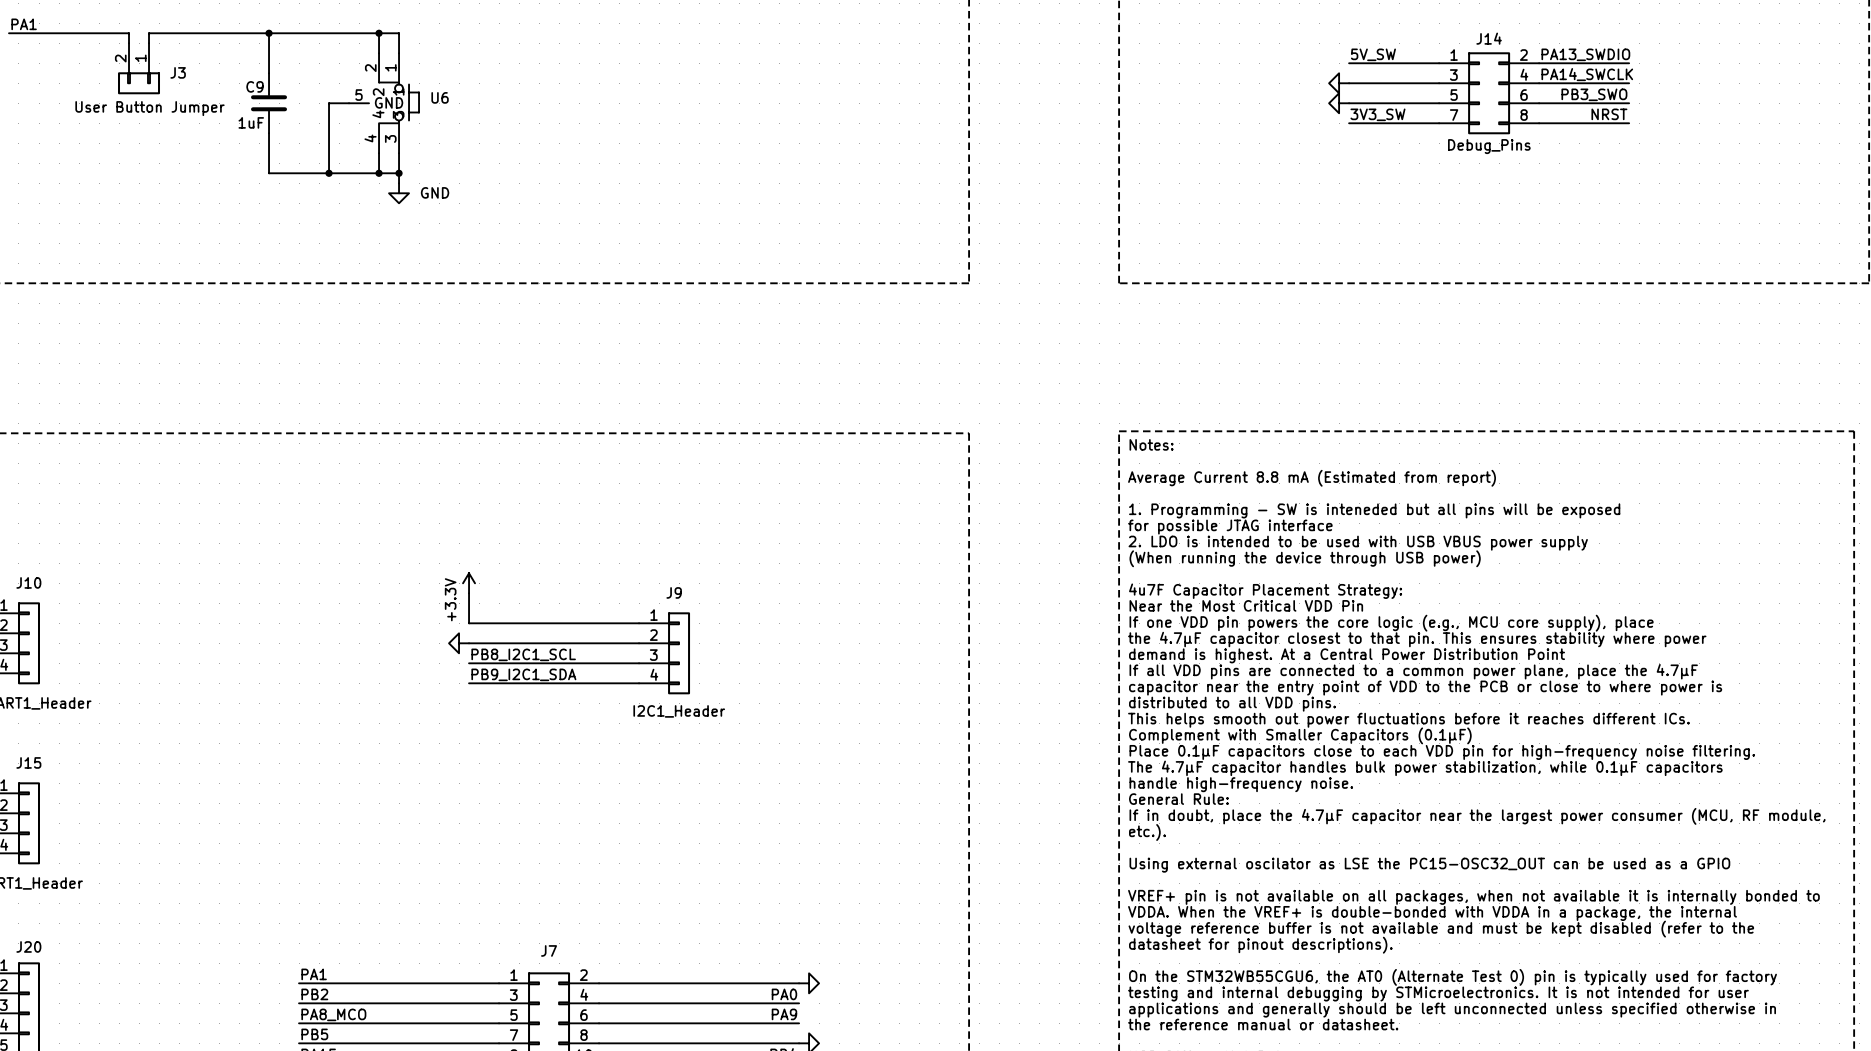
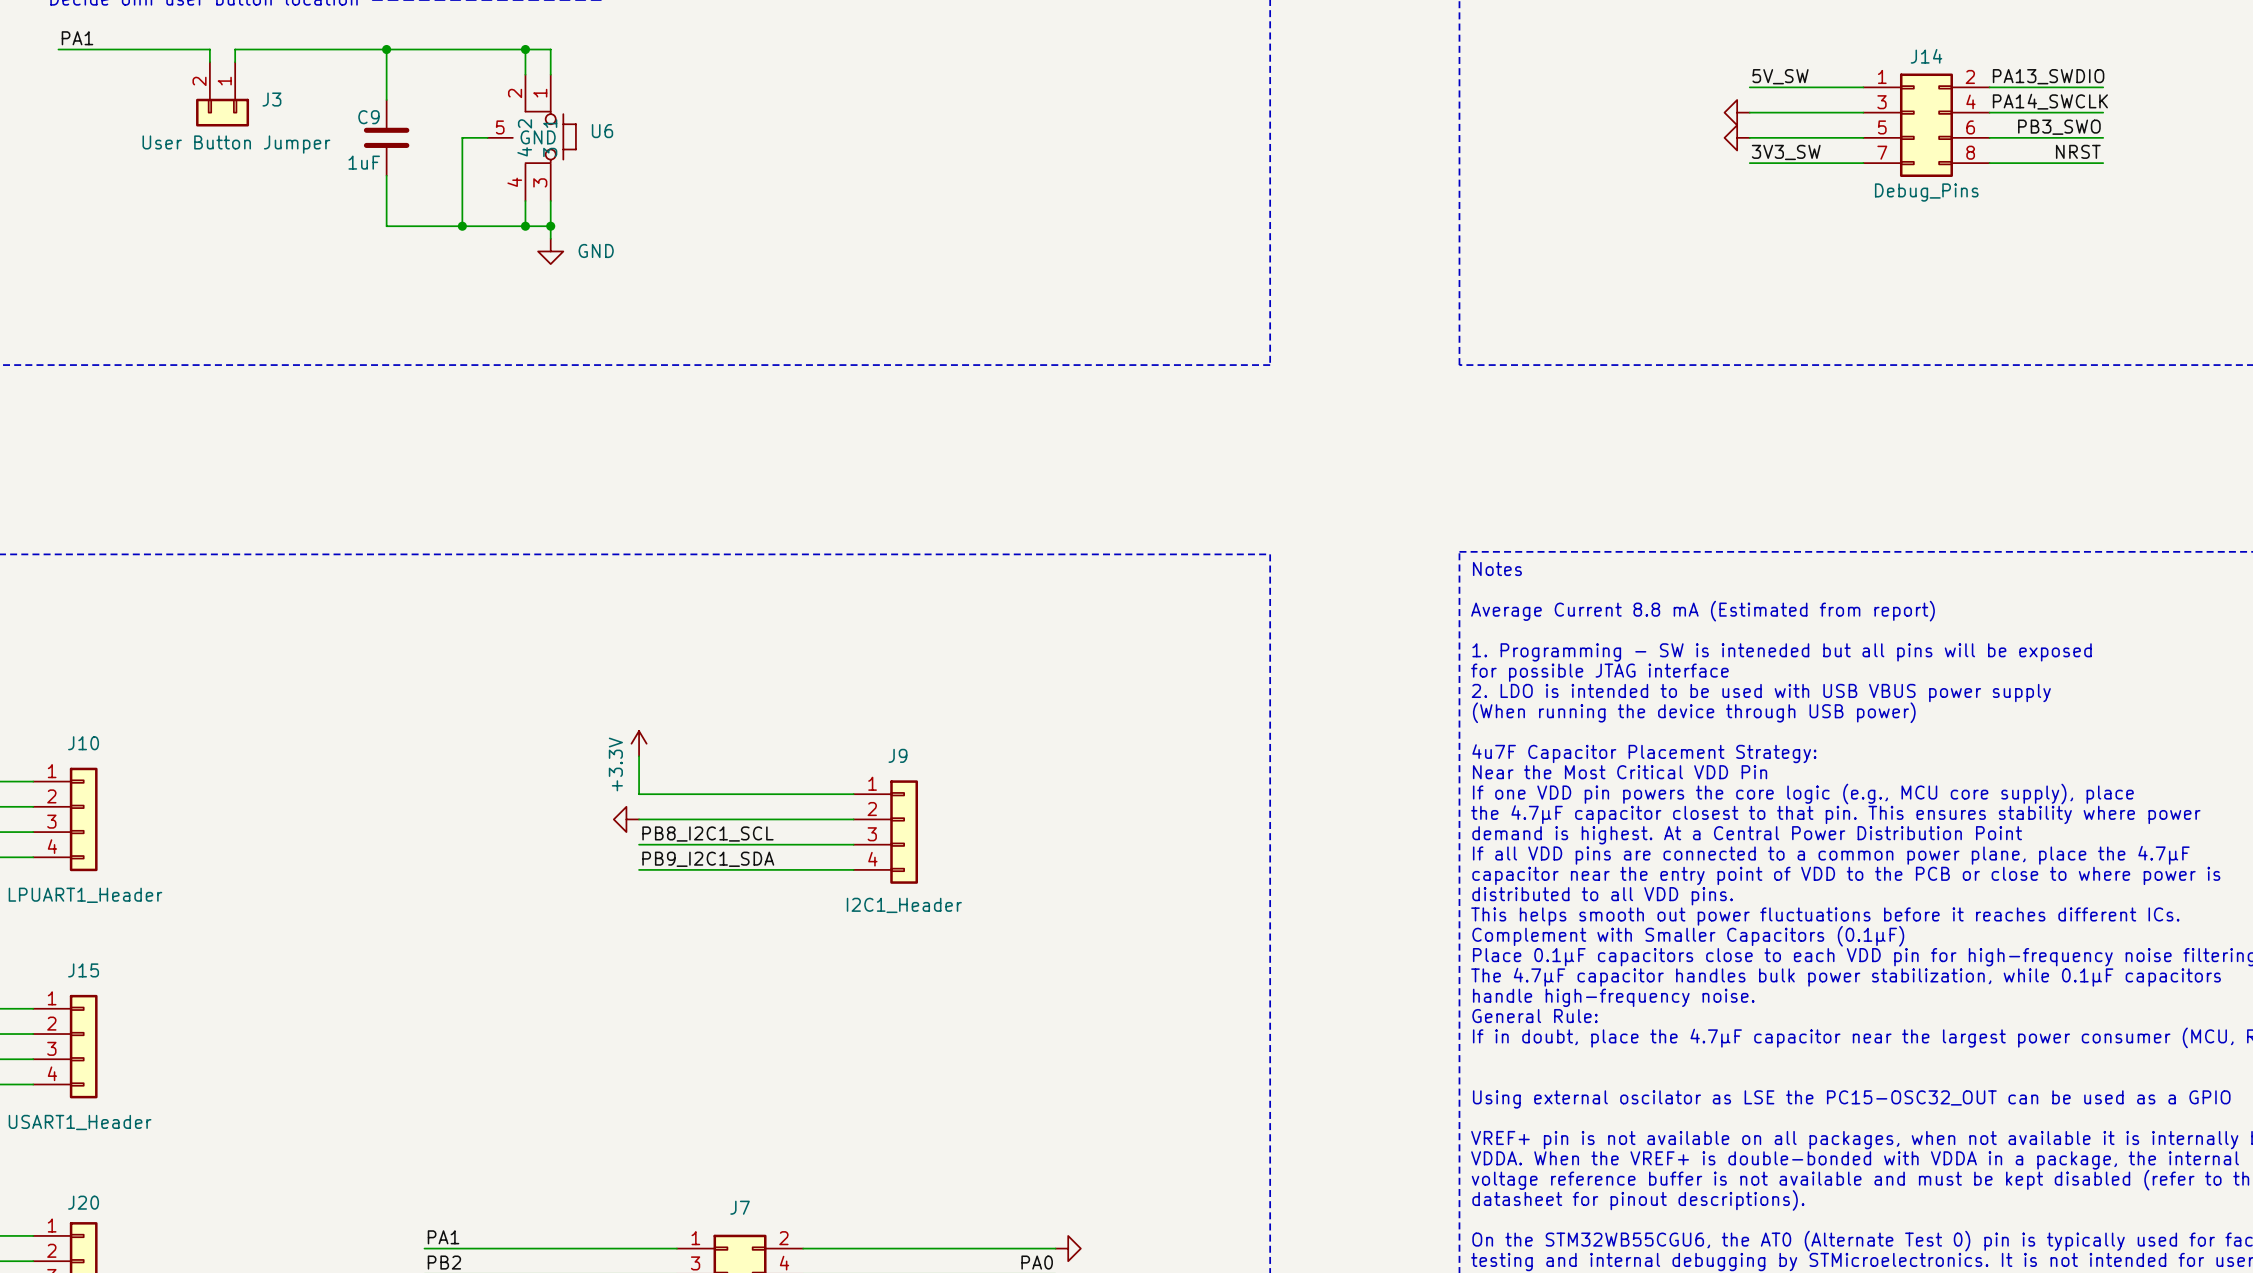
text: Notes: (1151, 444) -> Notes (1497, 568)
text: etc.). (1147, 832) -> none

